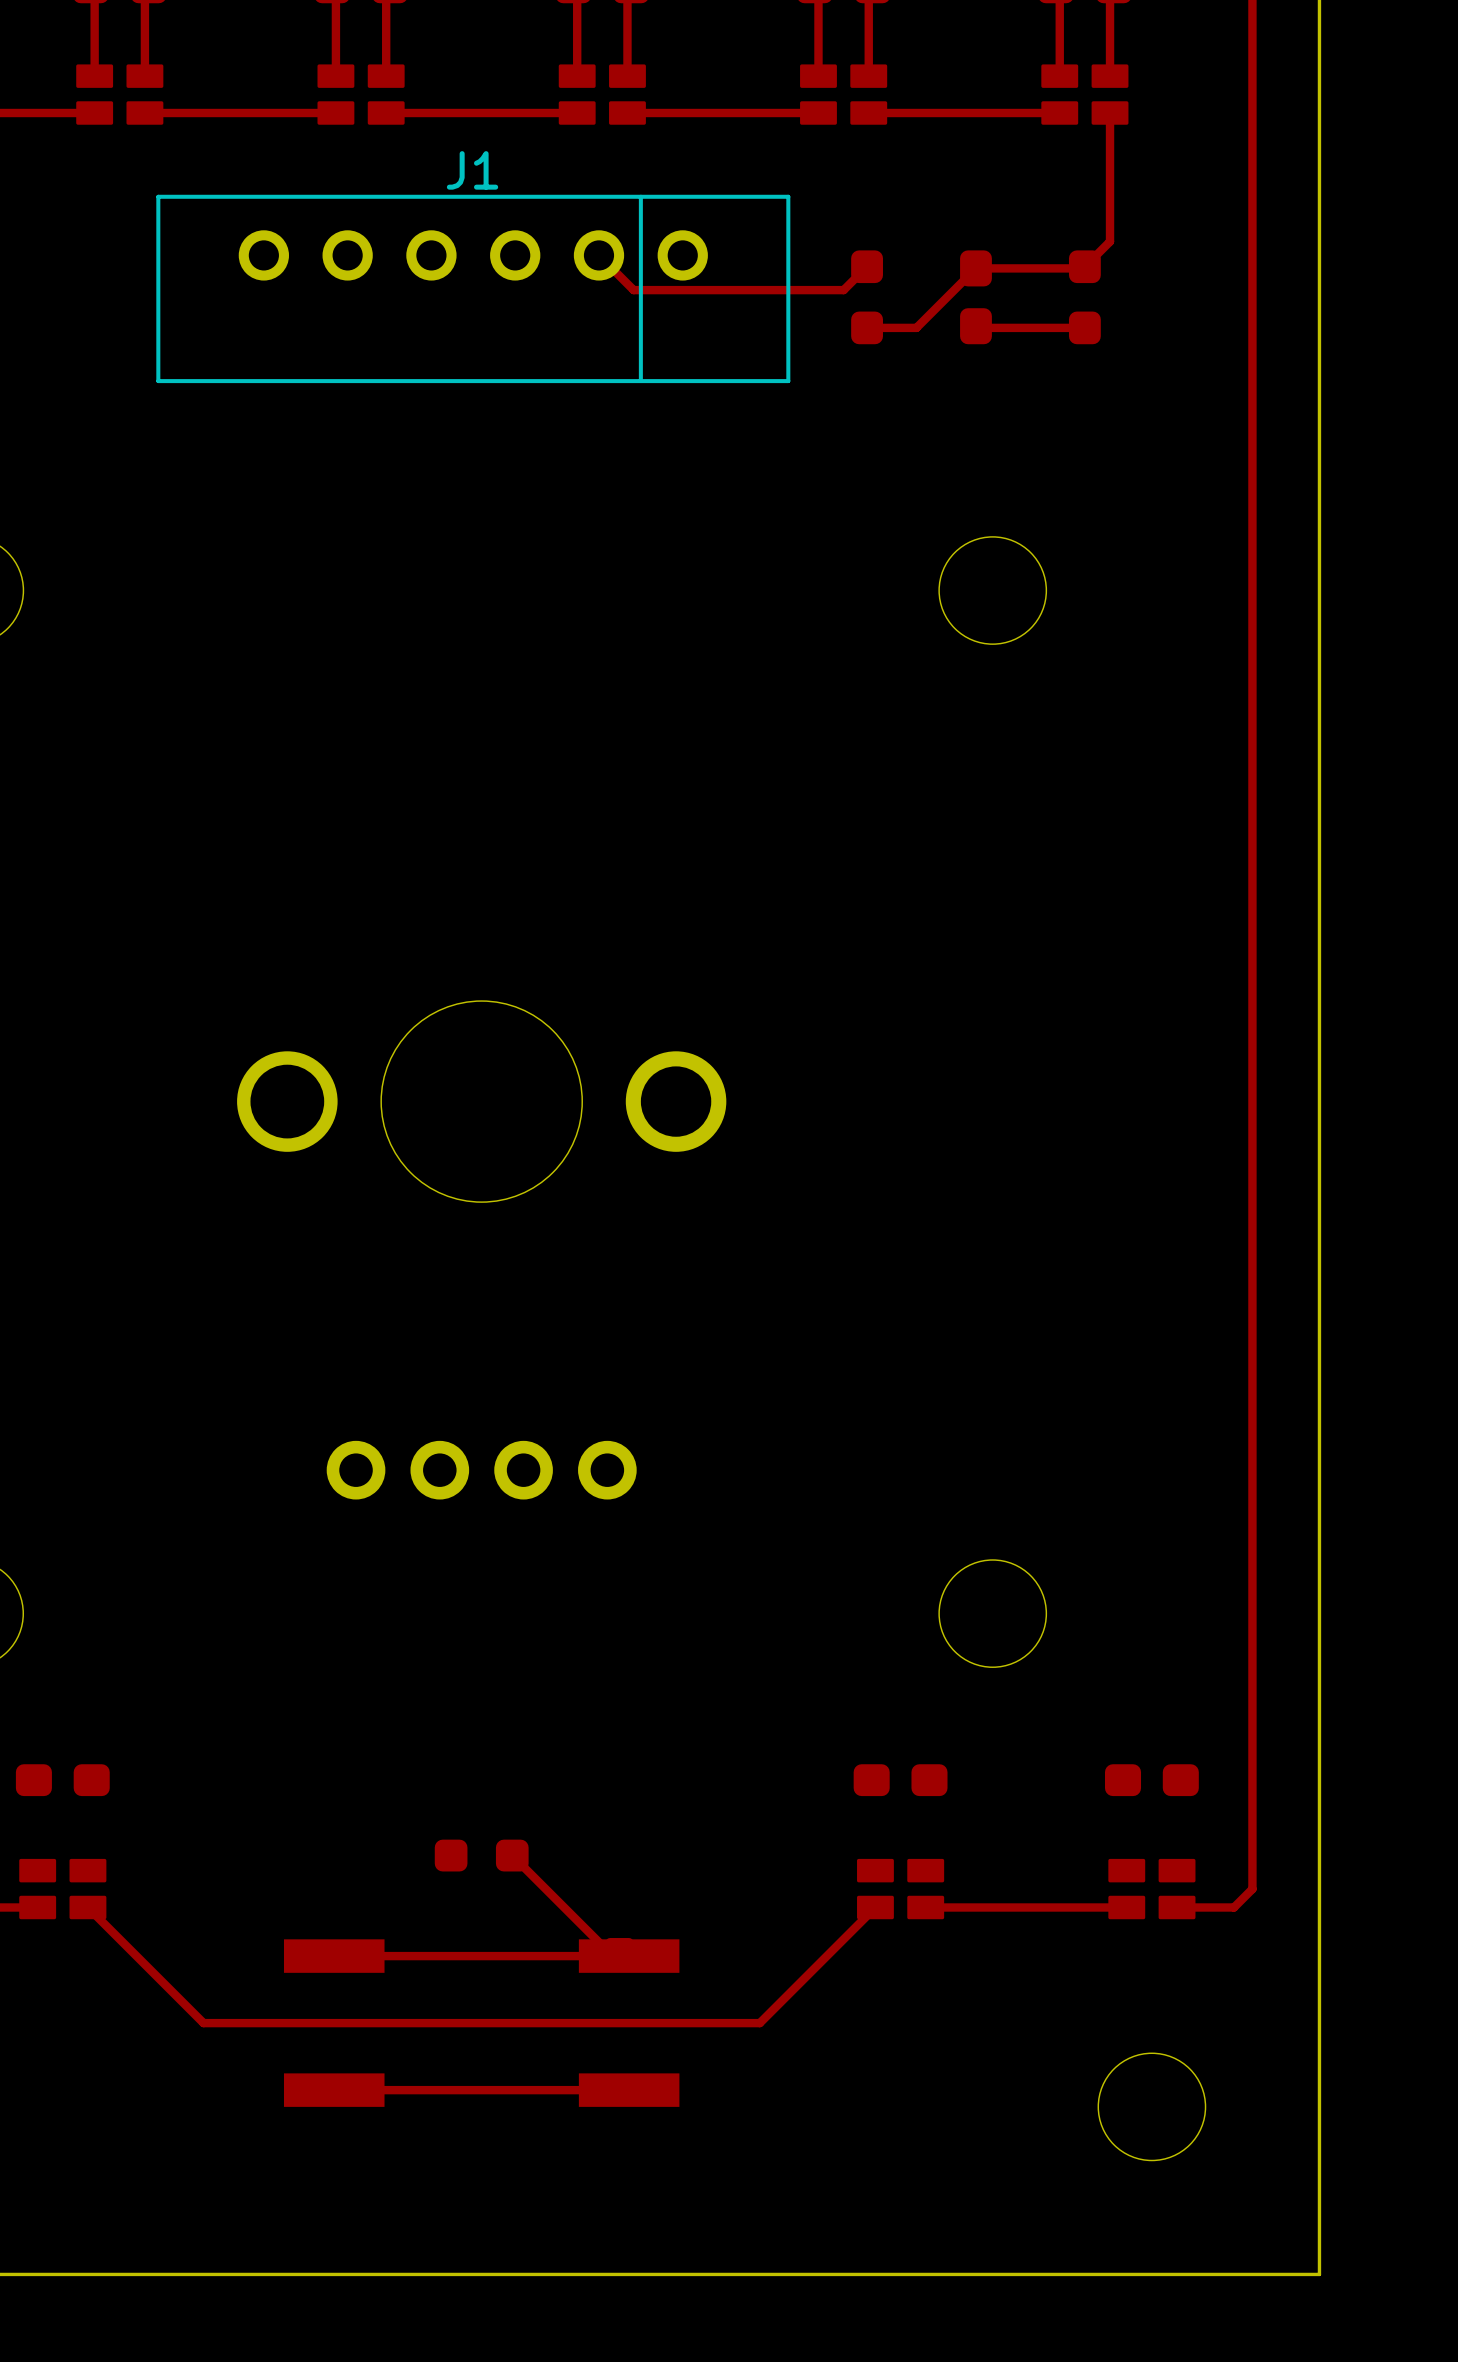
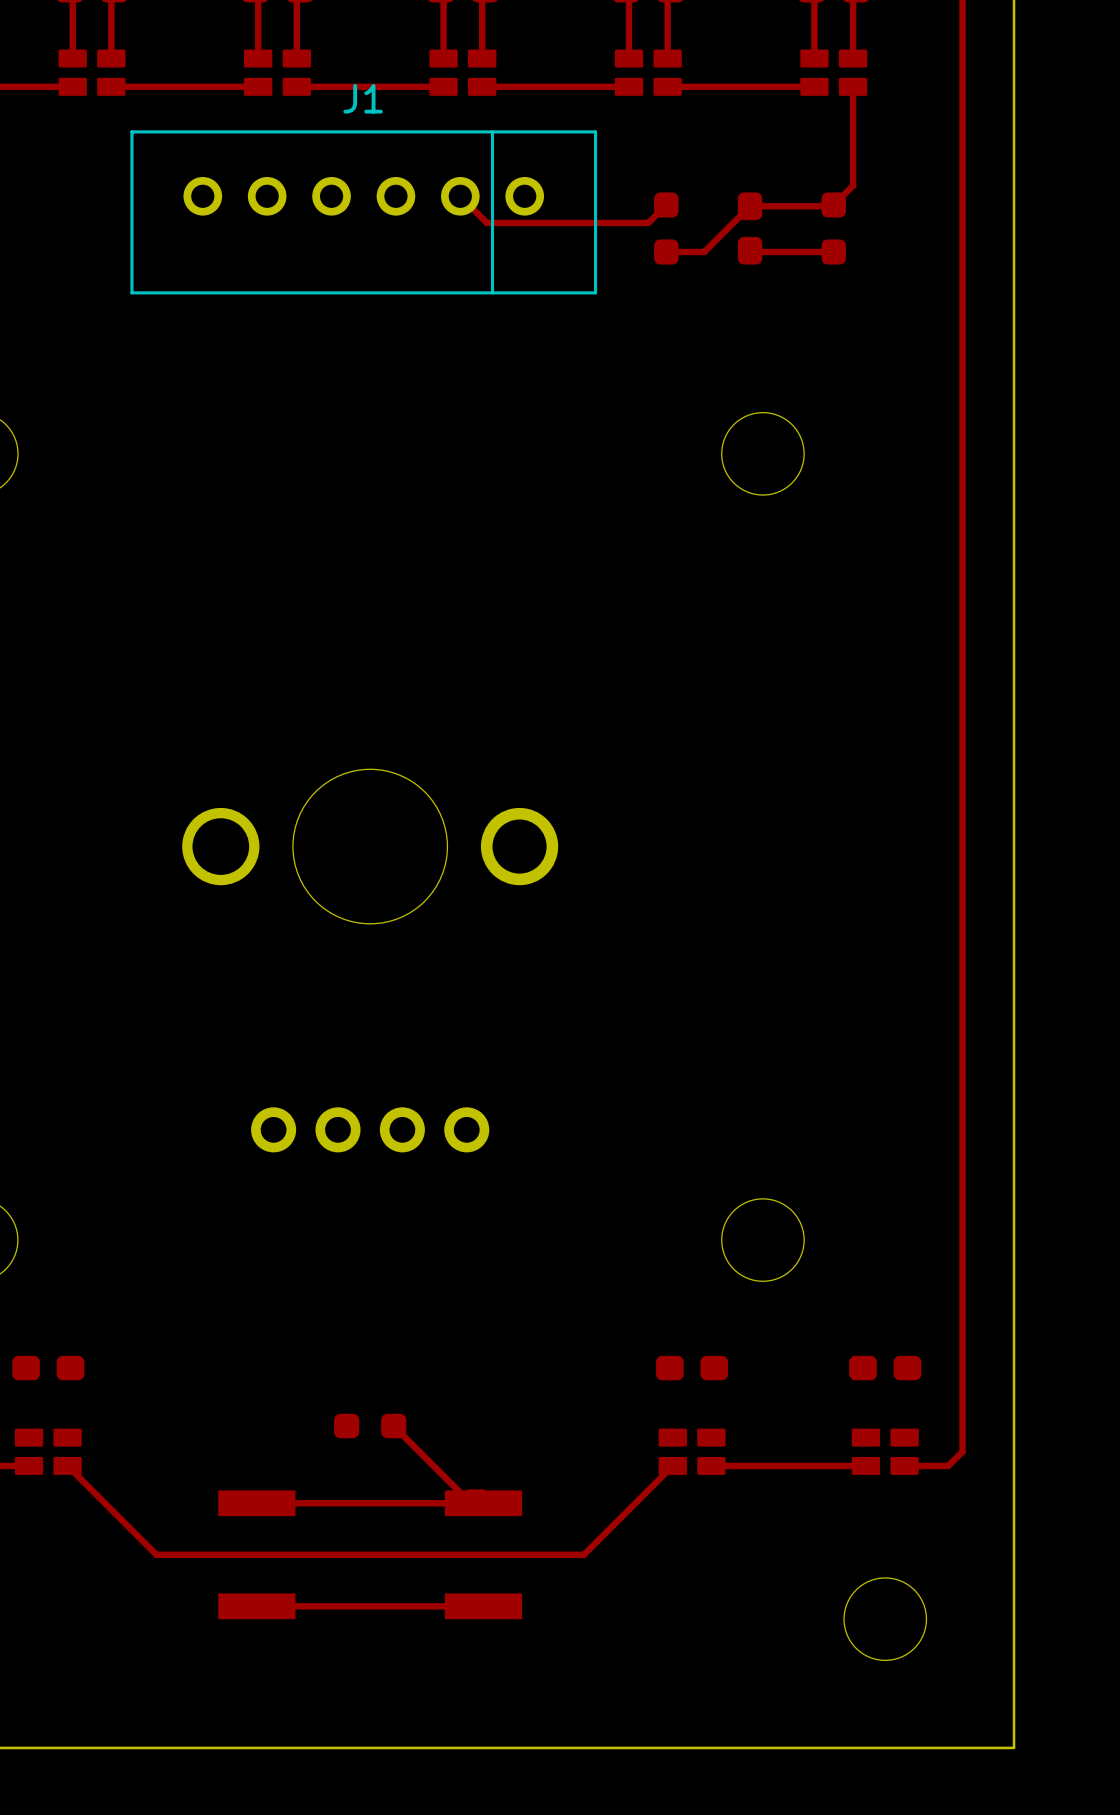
J1 name position: J1 (472, 170) -> J1 (363, 98)
J1 footprint: [156, 194, 791, 384] -> [130, 130, 598, 295]

